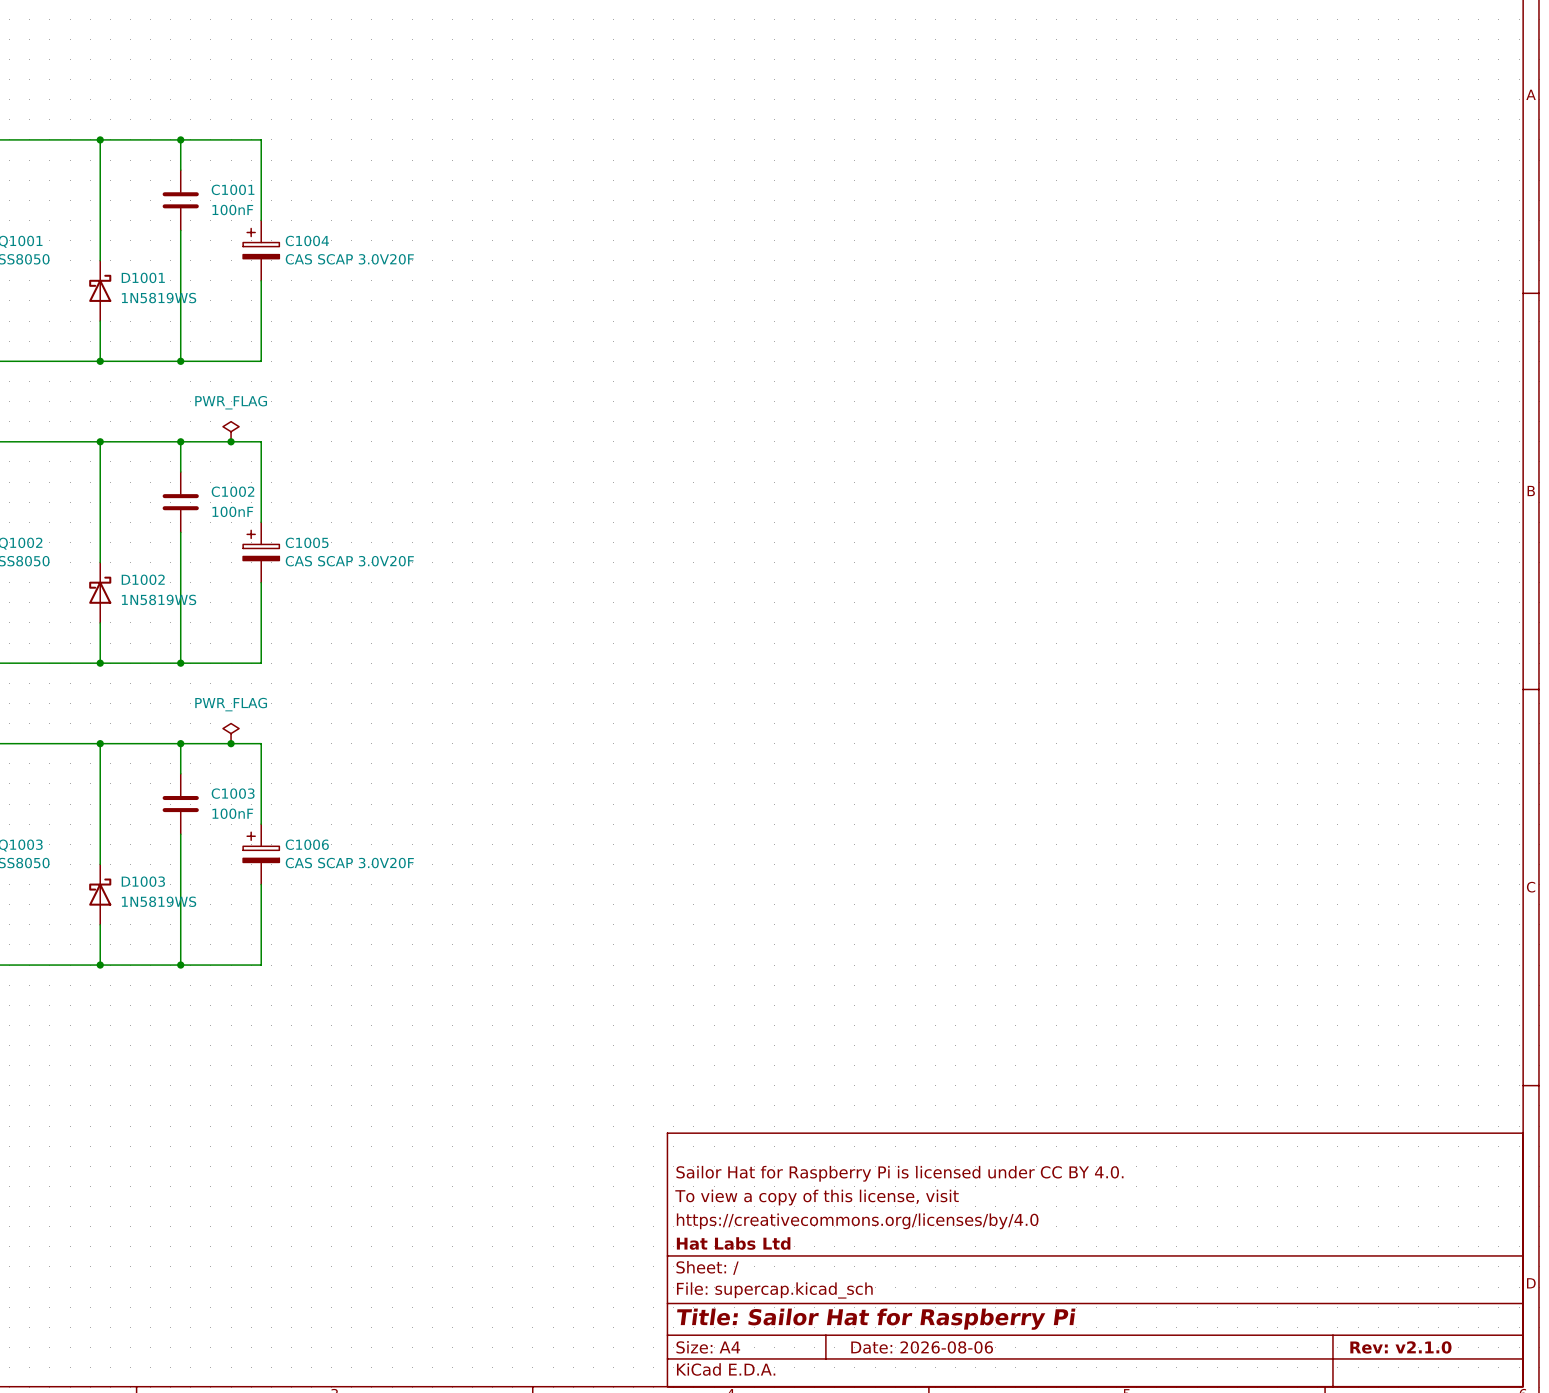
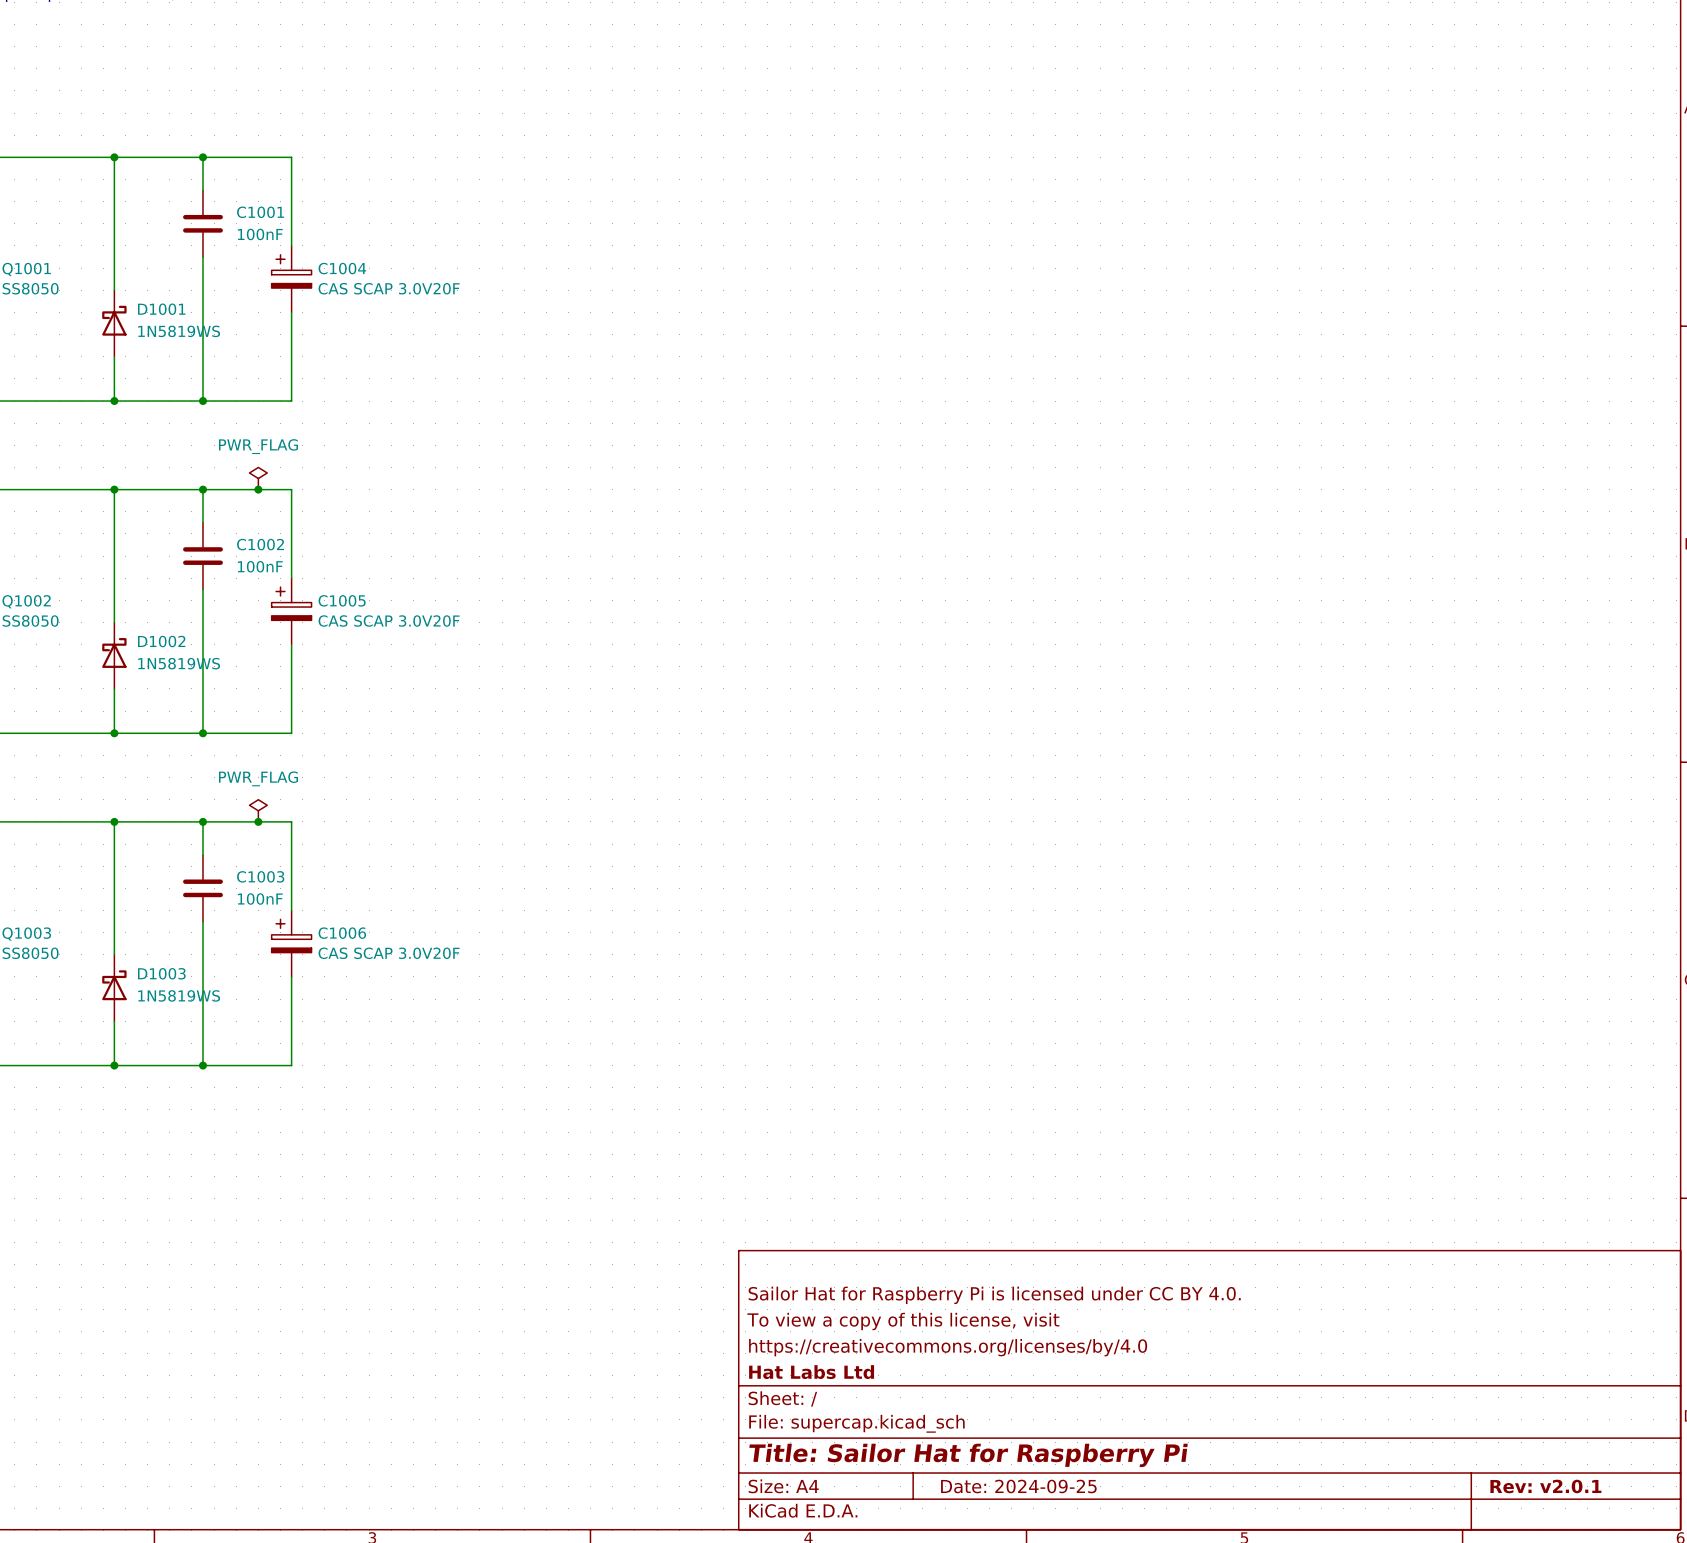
title block: Date: 2026-08-06 (922, 1347) -> Date: 2024-09-25 (1018, 1486)
title block: Rev: v2.1.0 (1400, 1347) -> Rev: v2.0.1 (1545, 1486)

